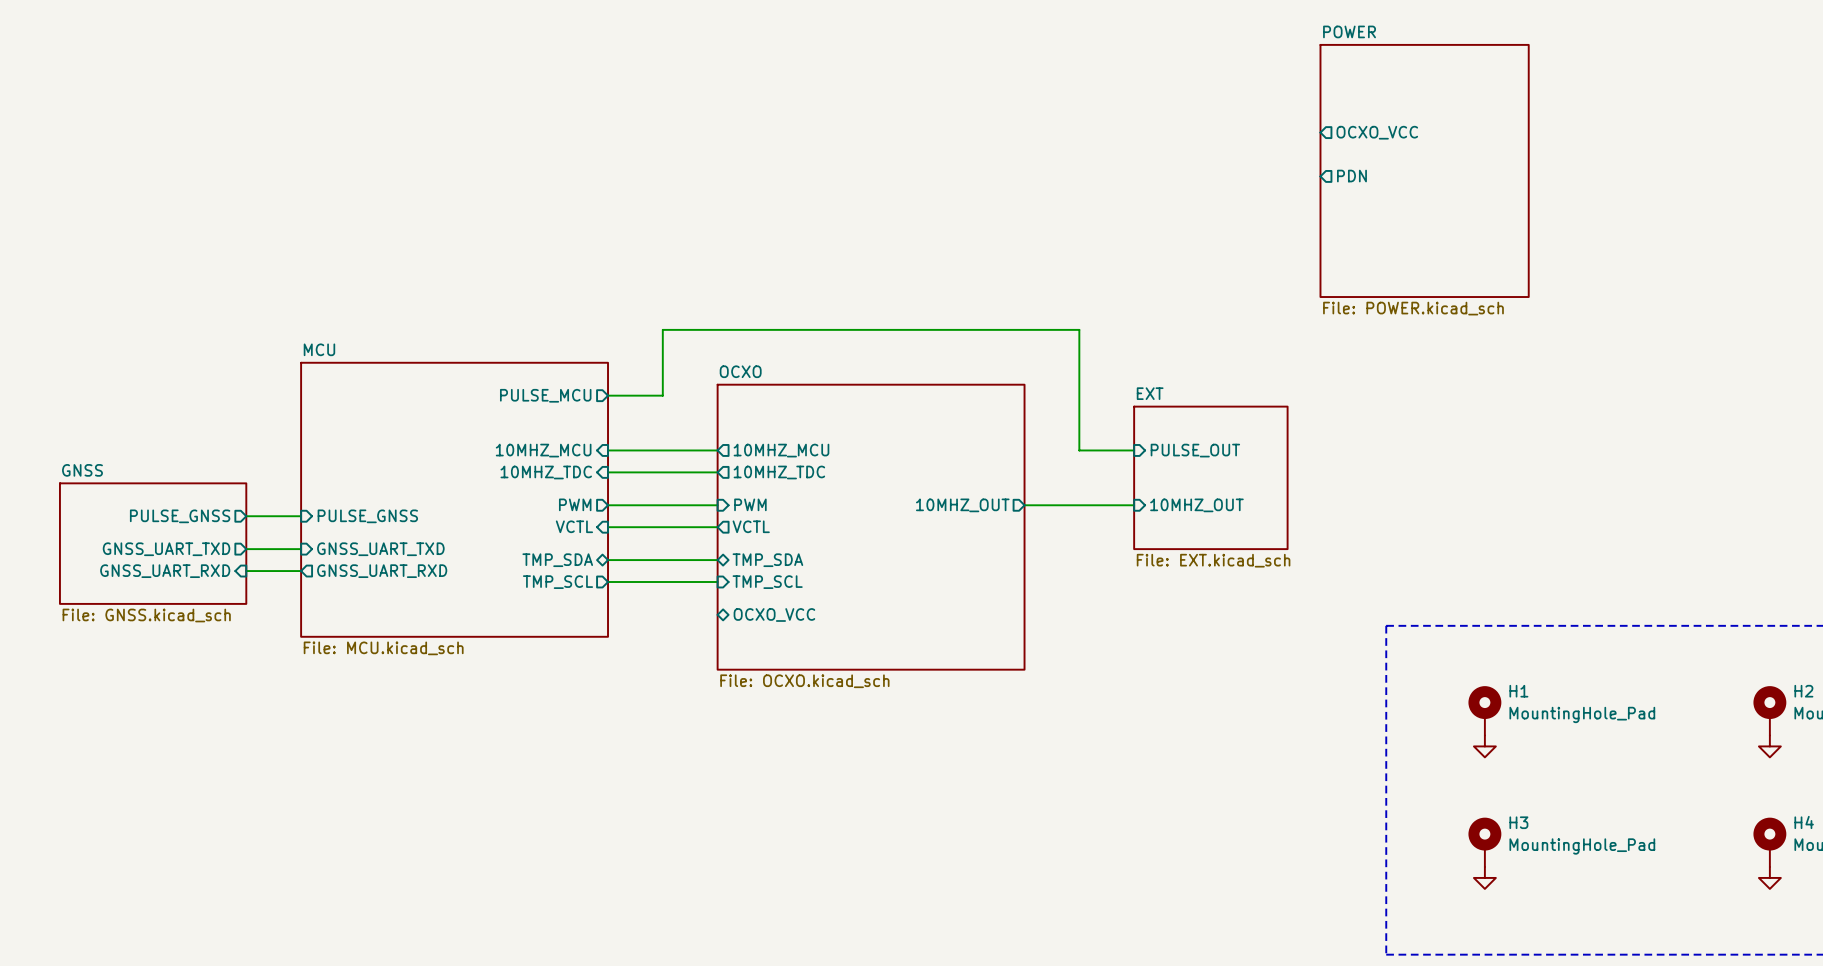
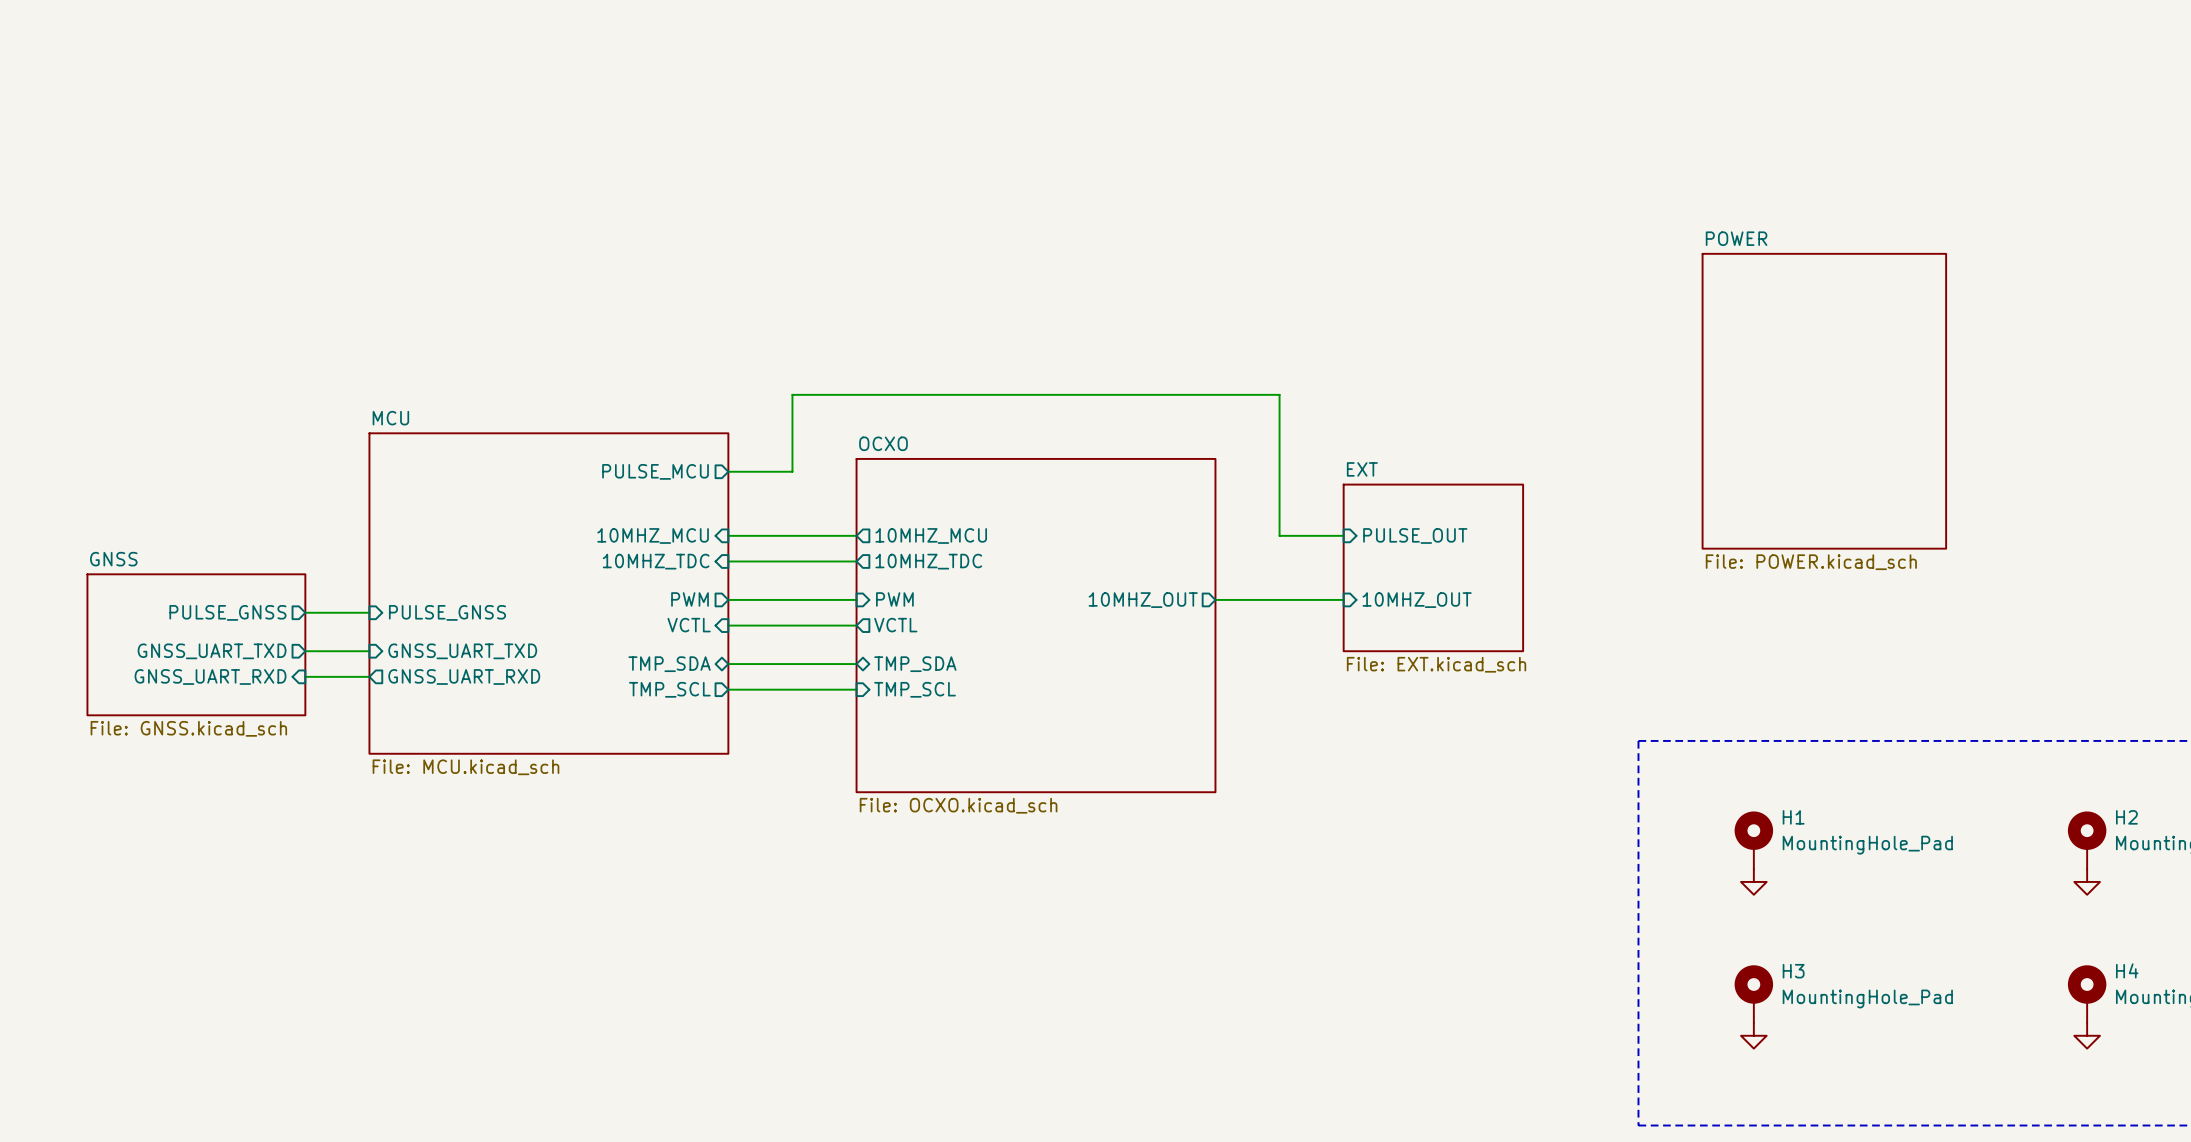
sheet pin: OCXO_VCC (1377, 132) -> none
sheet POWER position: (1424, 170) -> (1824, 401)
sheet pin: PDN (1351, 176) -> none
sheet pin: OCXO_VCC (774, 614) -> none

